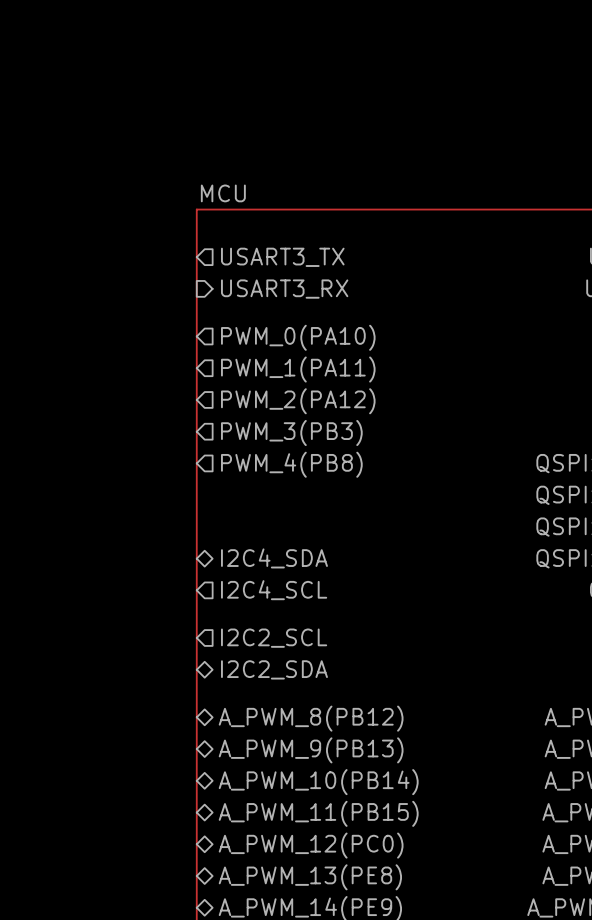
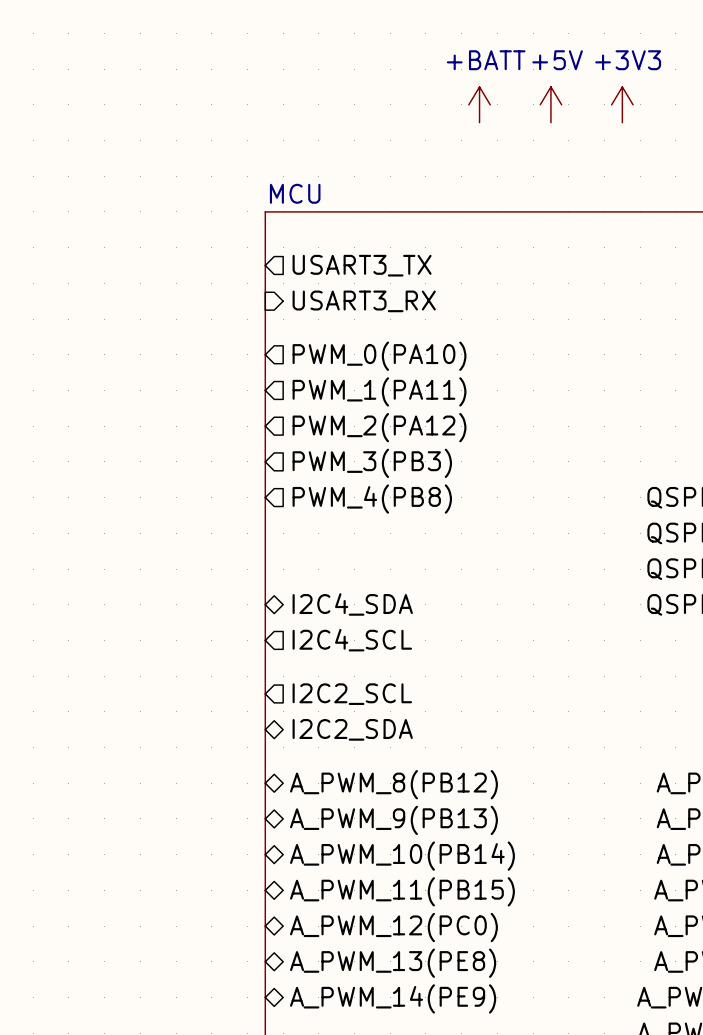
power symbol: none -> +BATT (479, 104)
power symbol: none -> +5V (550, 104)
power symbol: none -> +3V3 (622, 104)

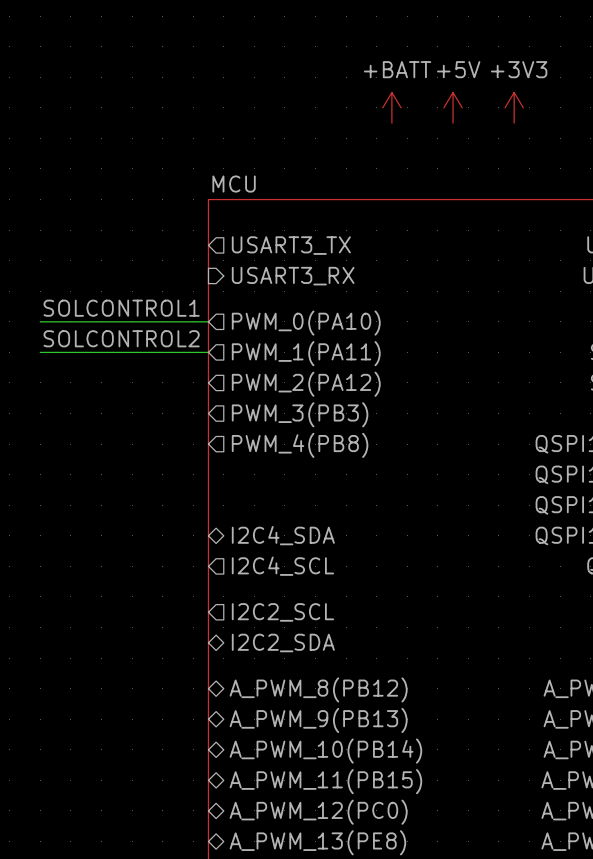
label: none -> SOLCONTROL1 (121, 308)
wire: none -> (40, 321) (208, 321)
label: none -> SOLCONTROL2 (121, 338)
wire: none -> (40, 352) (208, 352)

